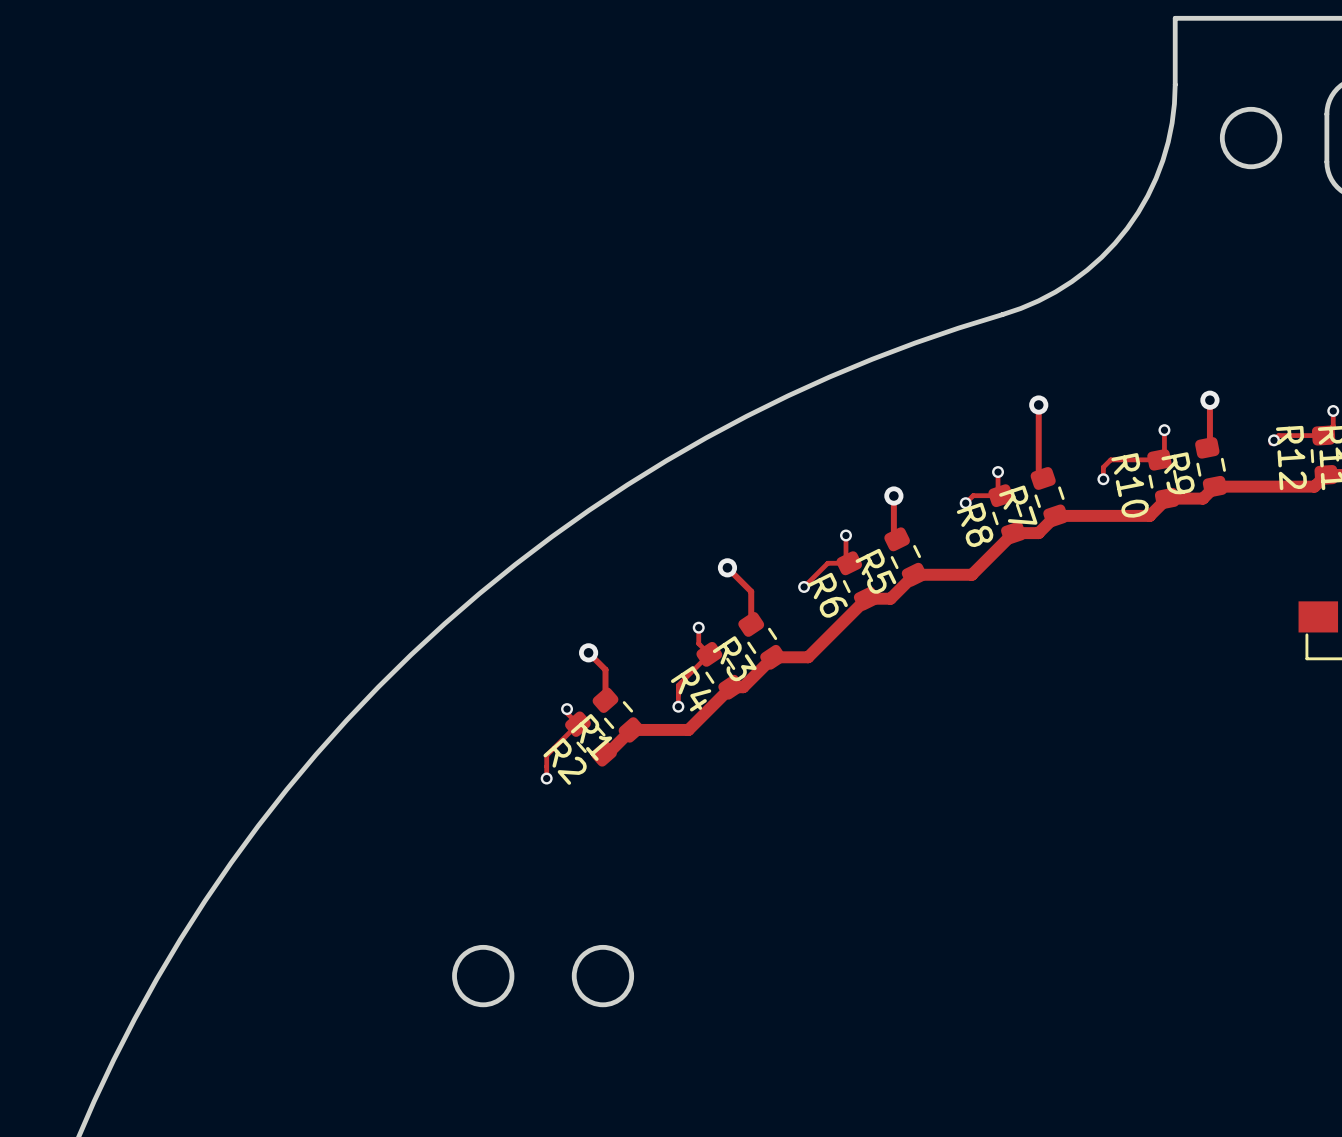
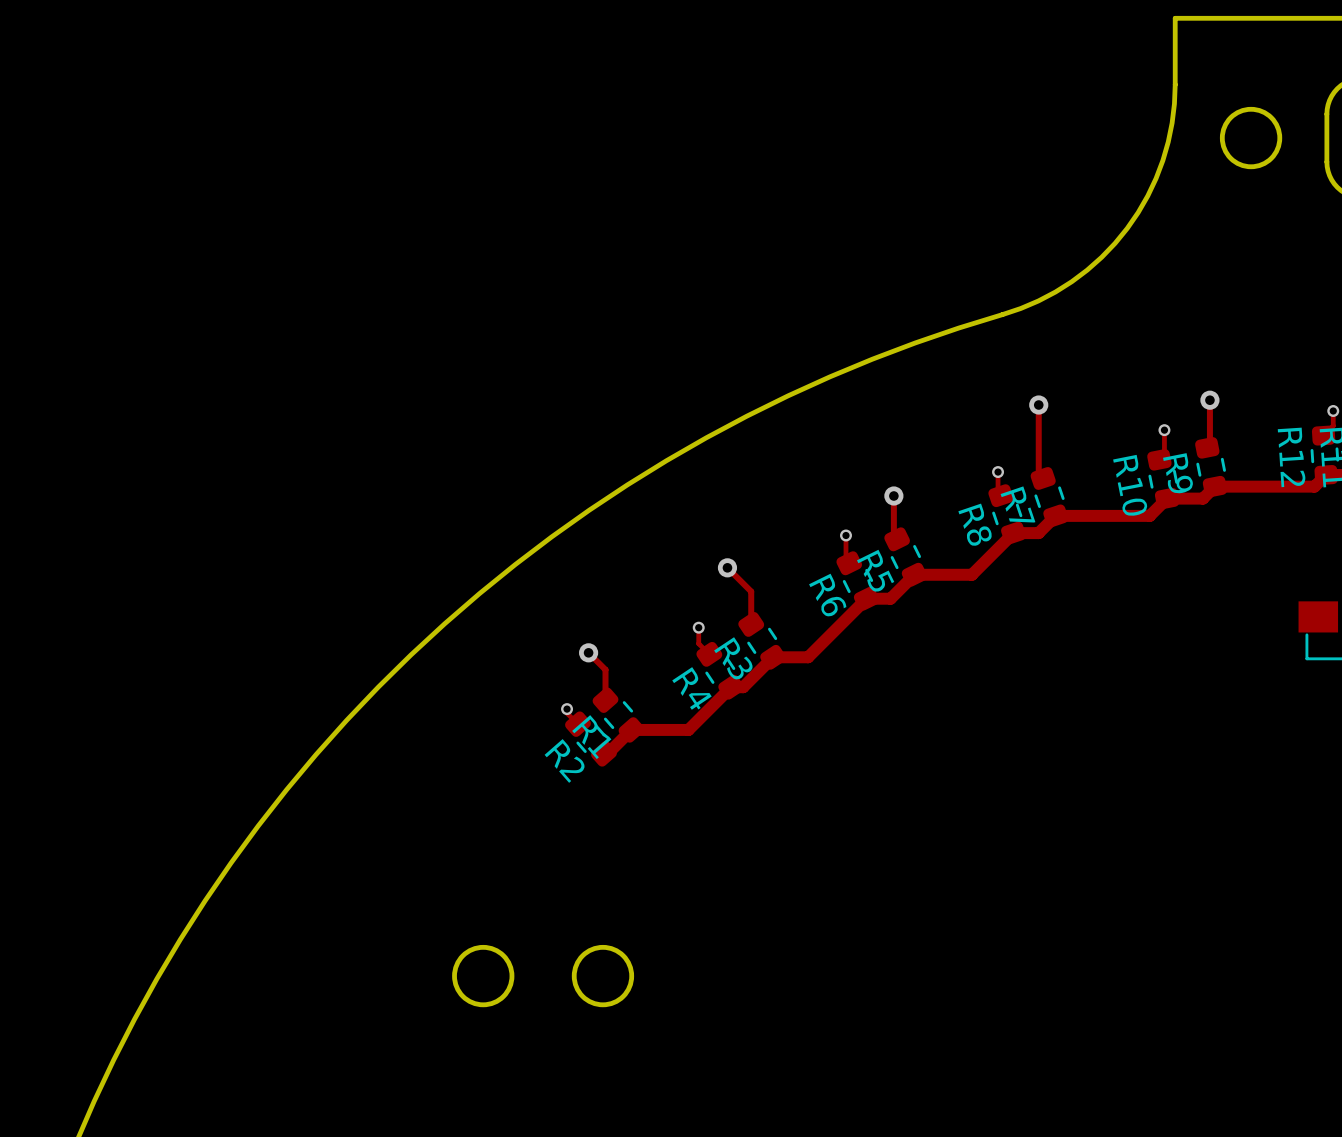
track: (1323, 435) (1278, 435) (1271, 443) -> none
via: (1273, 440) -> none
track: (1159, 459) (1110, 459) (1103, 467) (1103, 479) -> none
via: (1103, 479) -> none
track: (1000, 495) (973, 495) (965, 503) -> none
via: (965, 503) -> none
track: (849, 563) (827, 563) (804, 586) -> none
via: (804, 586) -> none
track: (709, 654) (678, 685) (678, 706) -> none
via: (678, 706) -> none
track: (577, 724) (546, 755) (546, 778) -> none
via: (546, 778) -> none

